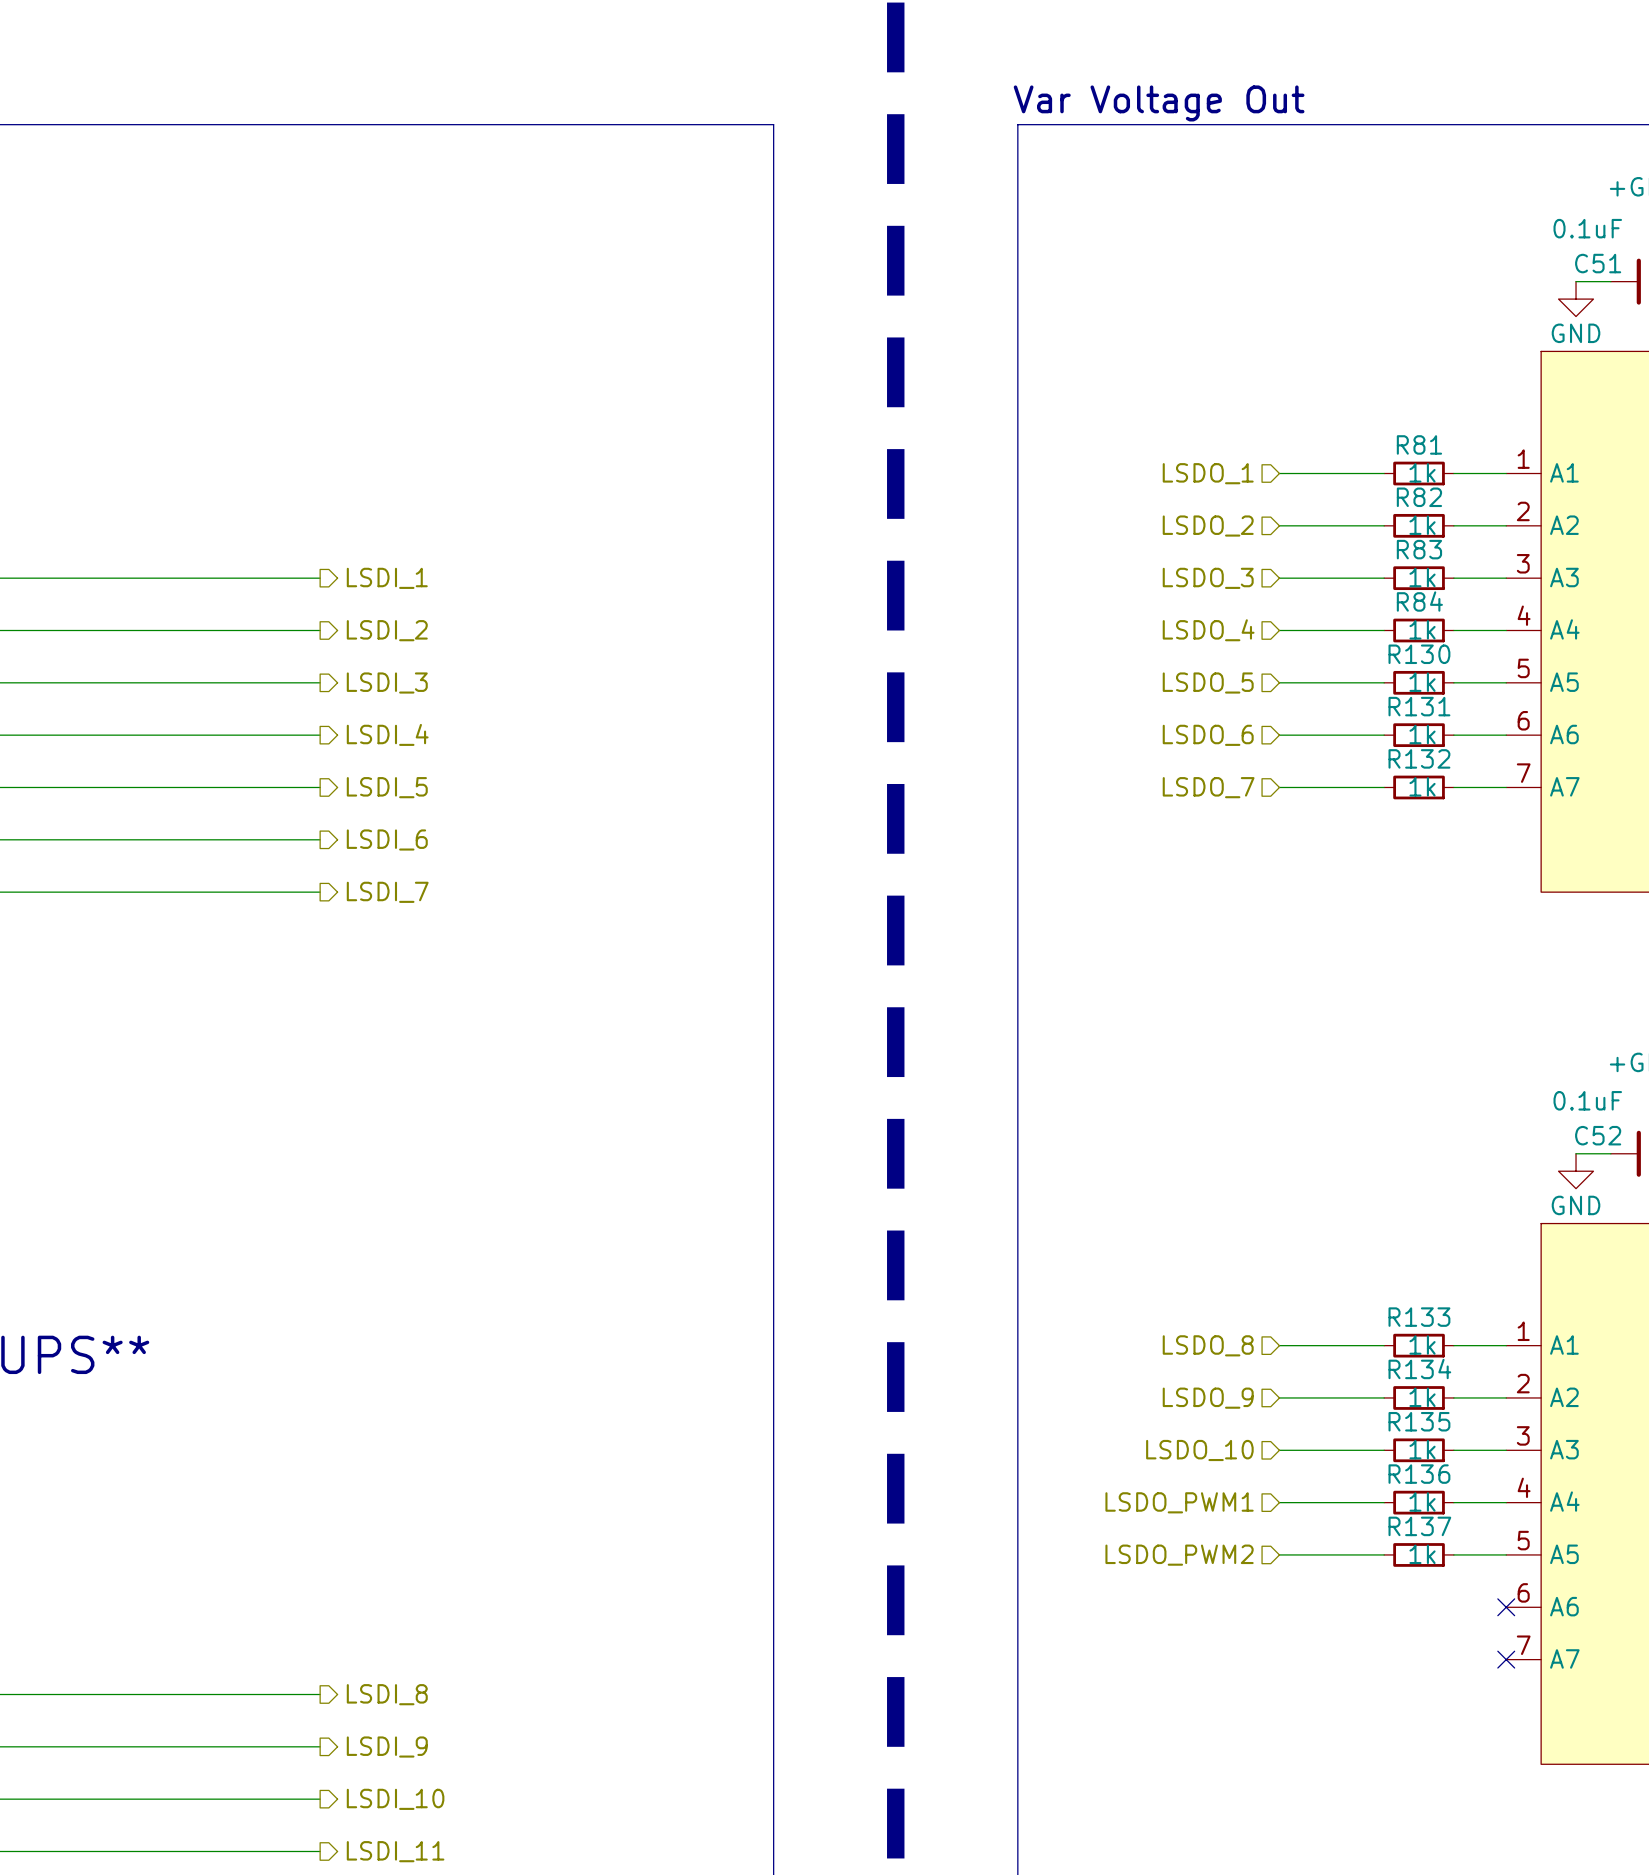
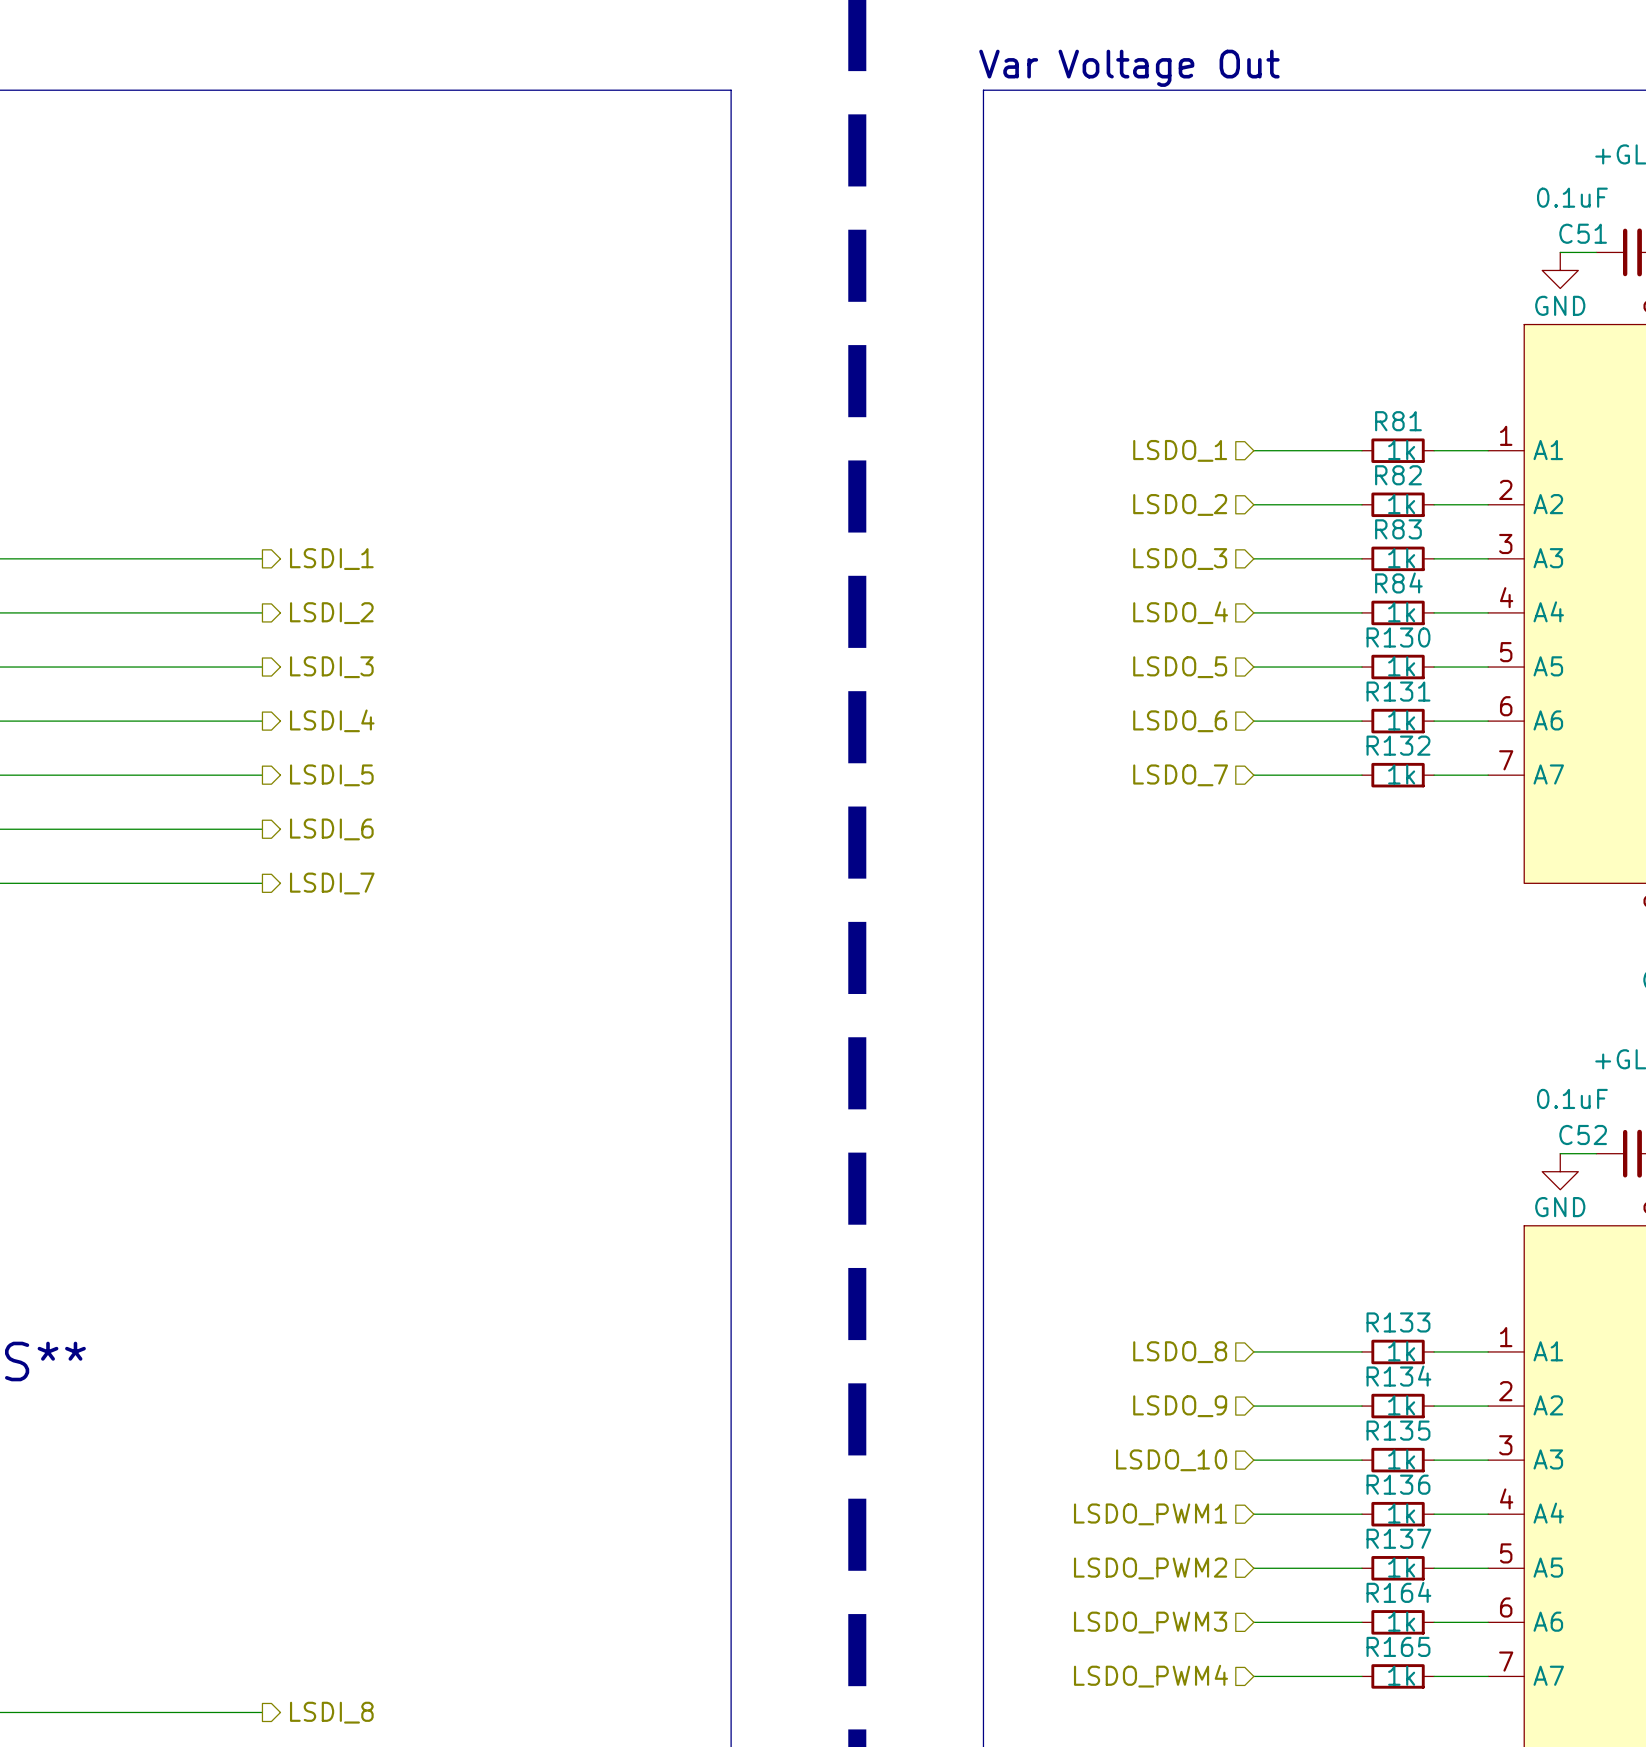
hierarchical label: none -> LSDO_PWM3 (1150, 1622)
wire: none -> (1253, 1622) (1361, 1622)
R164: none -> 1k (1398, 1622)
wire: none -> (1434, 1622) (1488, 1622)
no-connect mark: (1506, 1607) -> none
hierarchical label: none -> LSDO_PWM4 (1150, 1676)
wire: none -> (1253, 1676) (1361, 1676)
R165: none -> 1k (1398, 1676)
wire: none -> (1434, 1676) (1488, 1676)
no-connect mark: (1506, 1659) -> none

